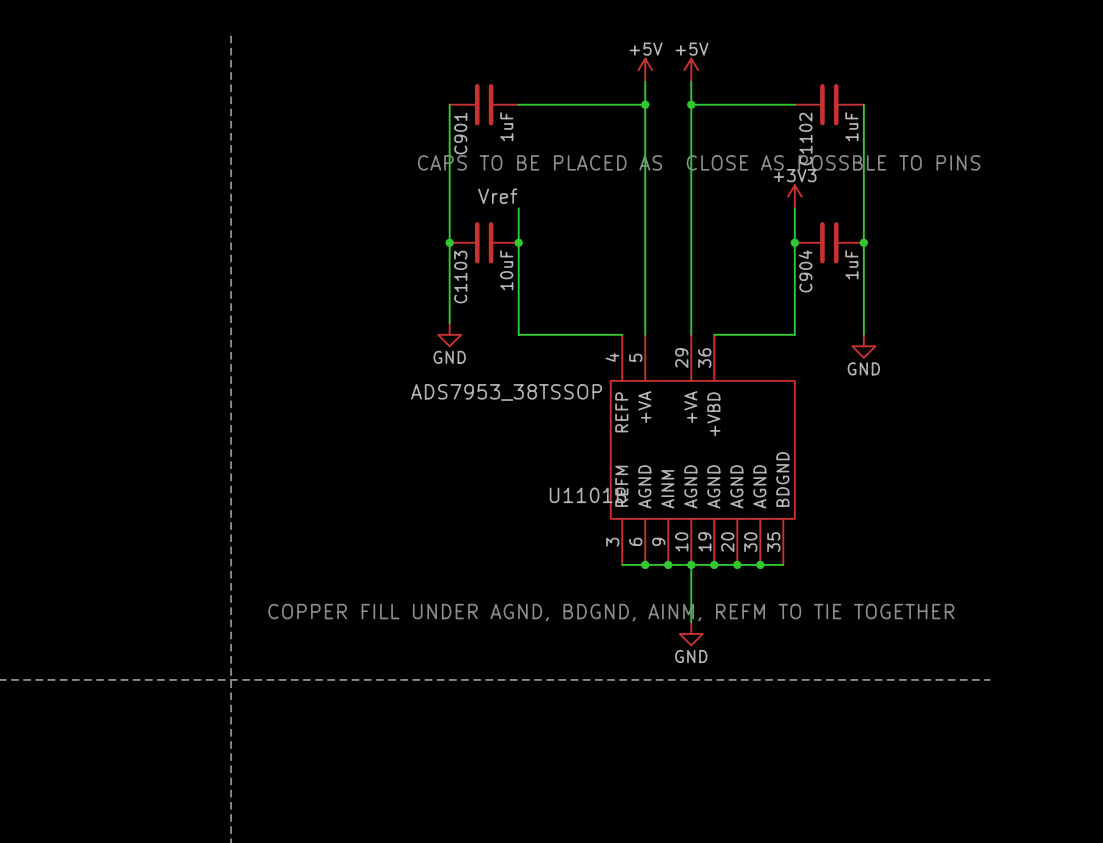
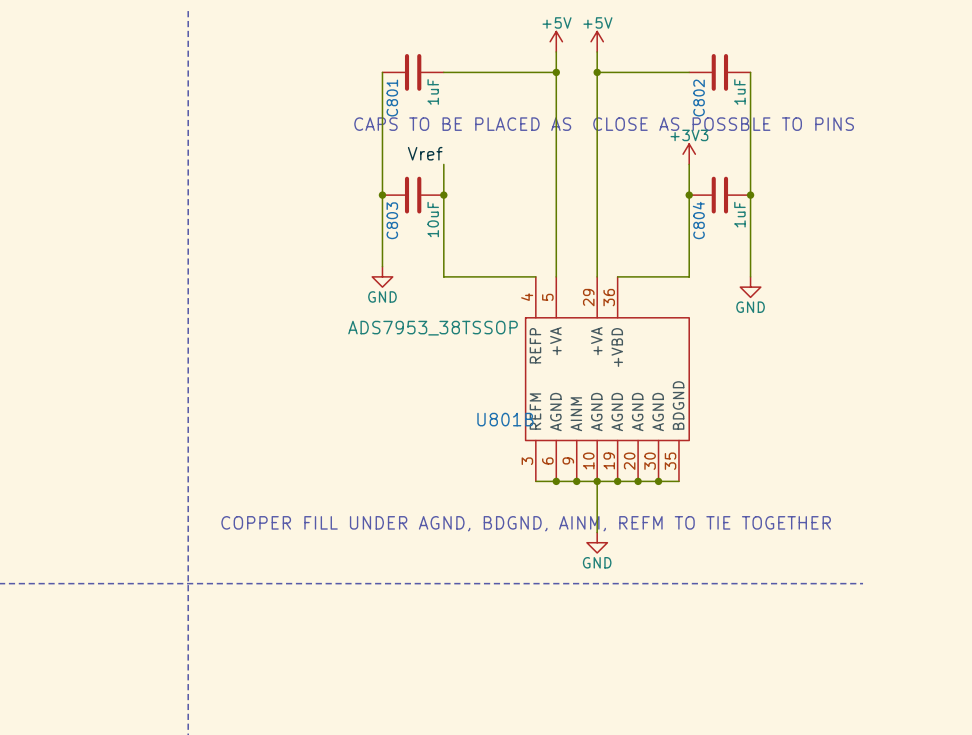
C901 name: C901 (460, 133) -> C801 (392, 98)
C1102 name: C1102 (805, 139) -> C802 (699, 98)
C904 name: C904 (805, 271) -> C804 (698, 220)
C1103 name: C1103 (460, 277) -> C803 (392, 220)
U1101B name: U1101B (588, 495) -> U801B (505, 419)

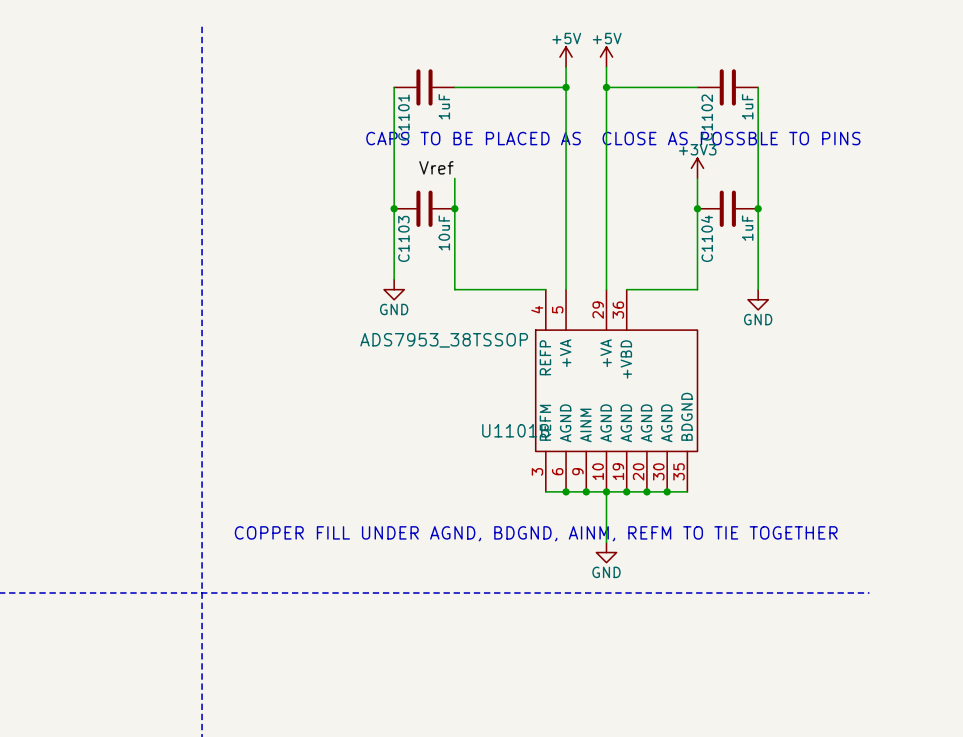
C801 name: C801 (392, 98) -> C1101 (403, 117)
C802 name: C802 (699, 98) -> C1102 (707, 117)
C803 name: C803 (392, 220) -> C1103 (403, 238)
C804 name: C804 (698, 220) -> C1104 (706, 238)
U801B name: U801B (505, 419) -> U1101B (515, 430)

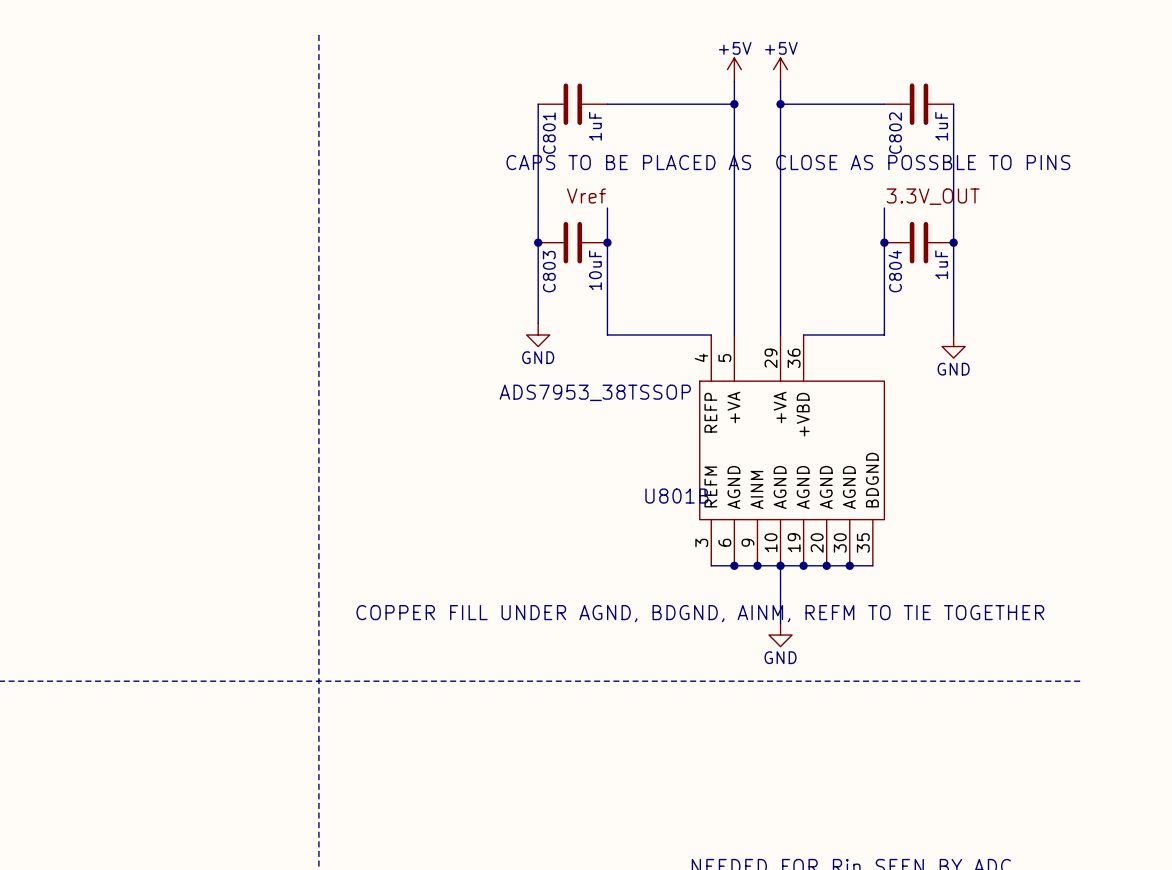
C1101 name: C1101 (403, 117) -> C801 (549, 133)
C1102 name: C1102 (707, 117) -> C802 (895, 133)
power symbol: +3V3 (697, 168) -> none
label: none -> 3.3V_OUT (933, 196)
C1103 name: C1103 (403, 238) -> C803 (549, 271)
C1104 name: C1104 (706, 238) -> C804 (895, 271)
U1101B name: U1101B (515, 430) -> U801B (677, 496)

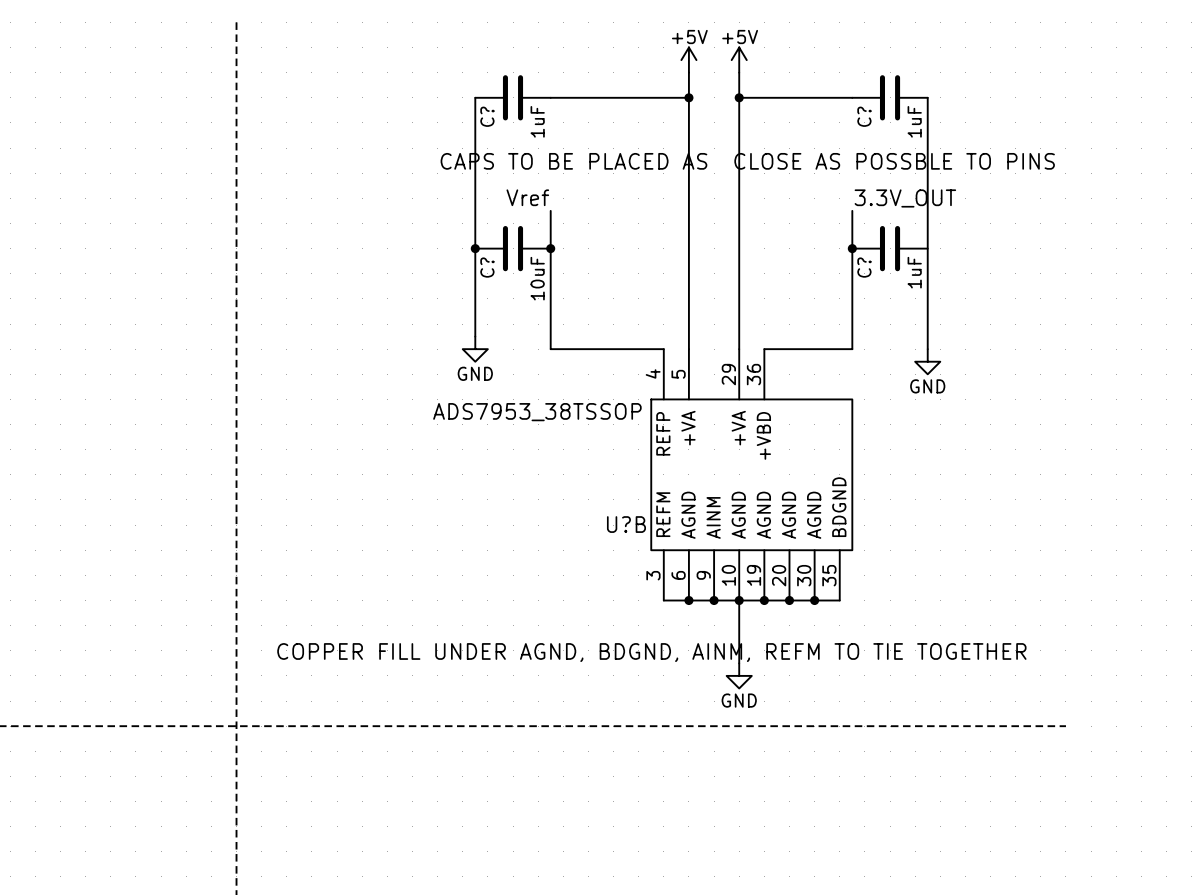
C801 name: C801 (549, 133) -> C? (487, 116)
C802 name: C802 (895, 133) -> C? (864, 116)
junction: (953, 242) -> none
C803 name: C803 (549, 271) -> C? (487, 267)
C804 name: C804 (895, 271) -> C? (864, 267)
U801B name: U801B (677, 496) -> U?B (626, 524)

